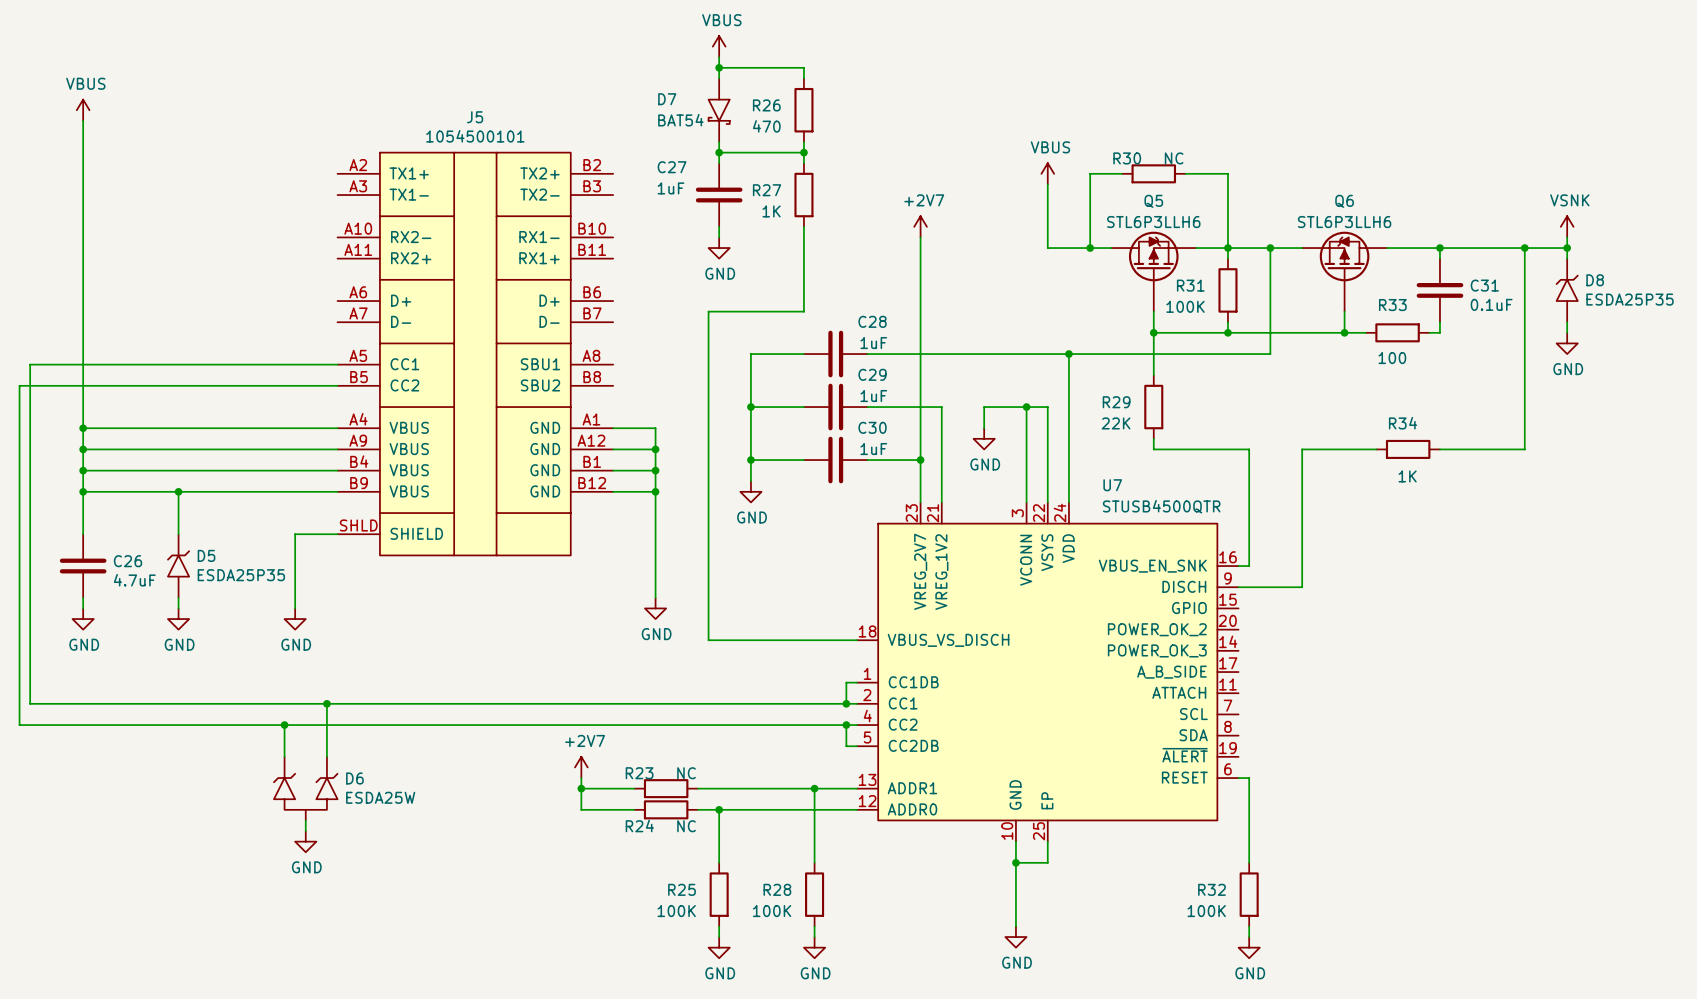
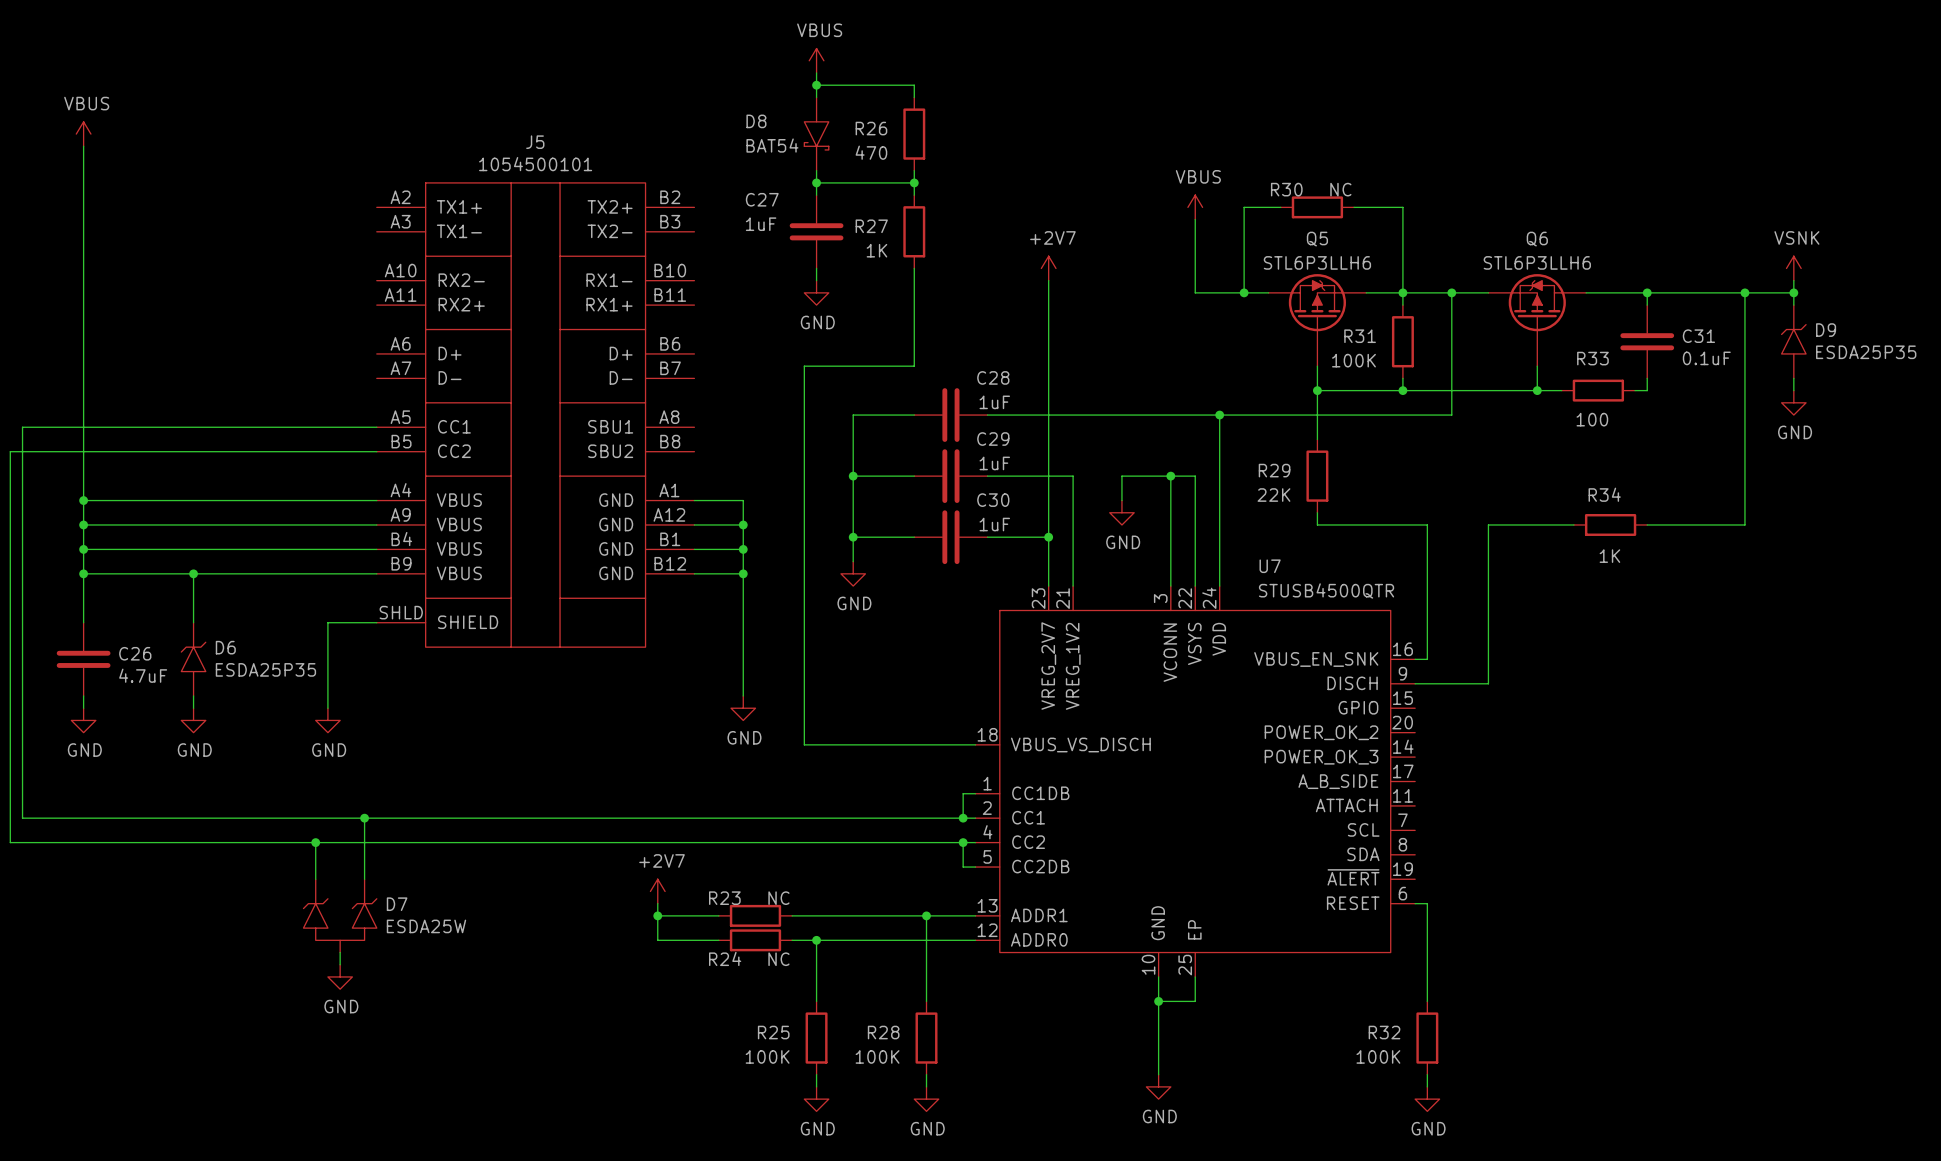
D7 name: D7 (667, 99) -> D8 (756, 121)
D8 name: D8 (1595, 280) -> D9 (1826, 330)
D5 name: D5 (206, 555) -> D6 (225, 647)
D6 name: D6 (354, 778) -> D7 (397, 904)

